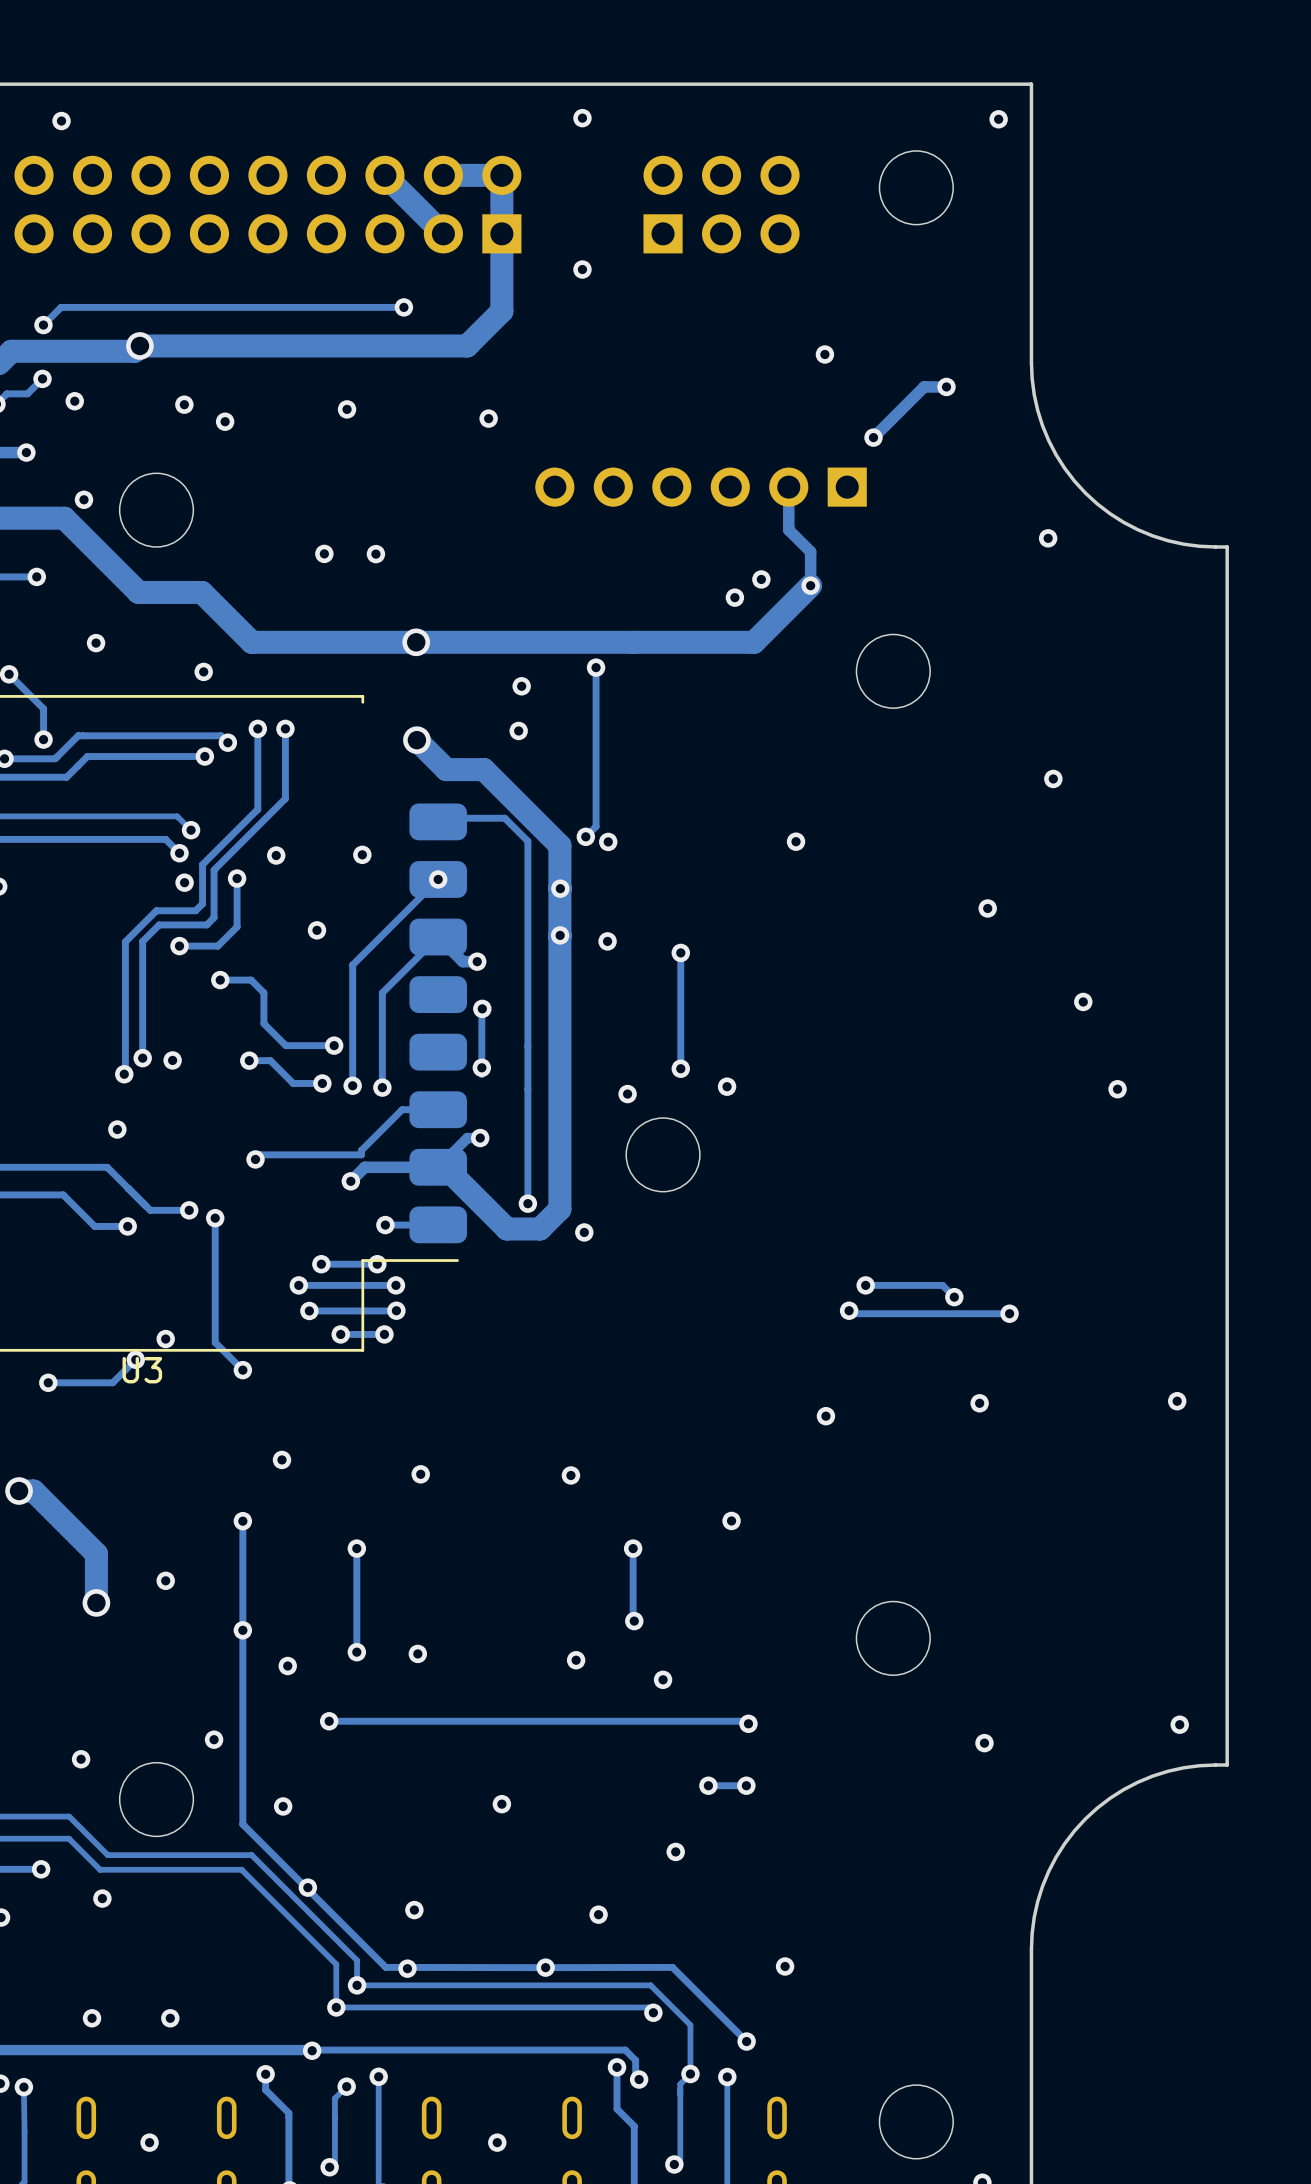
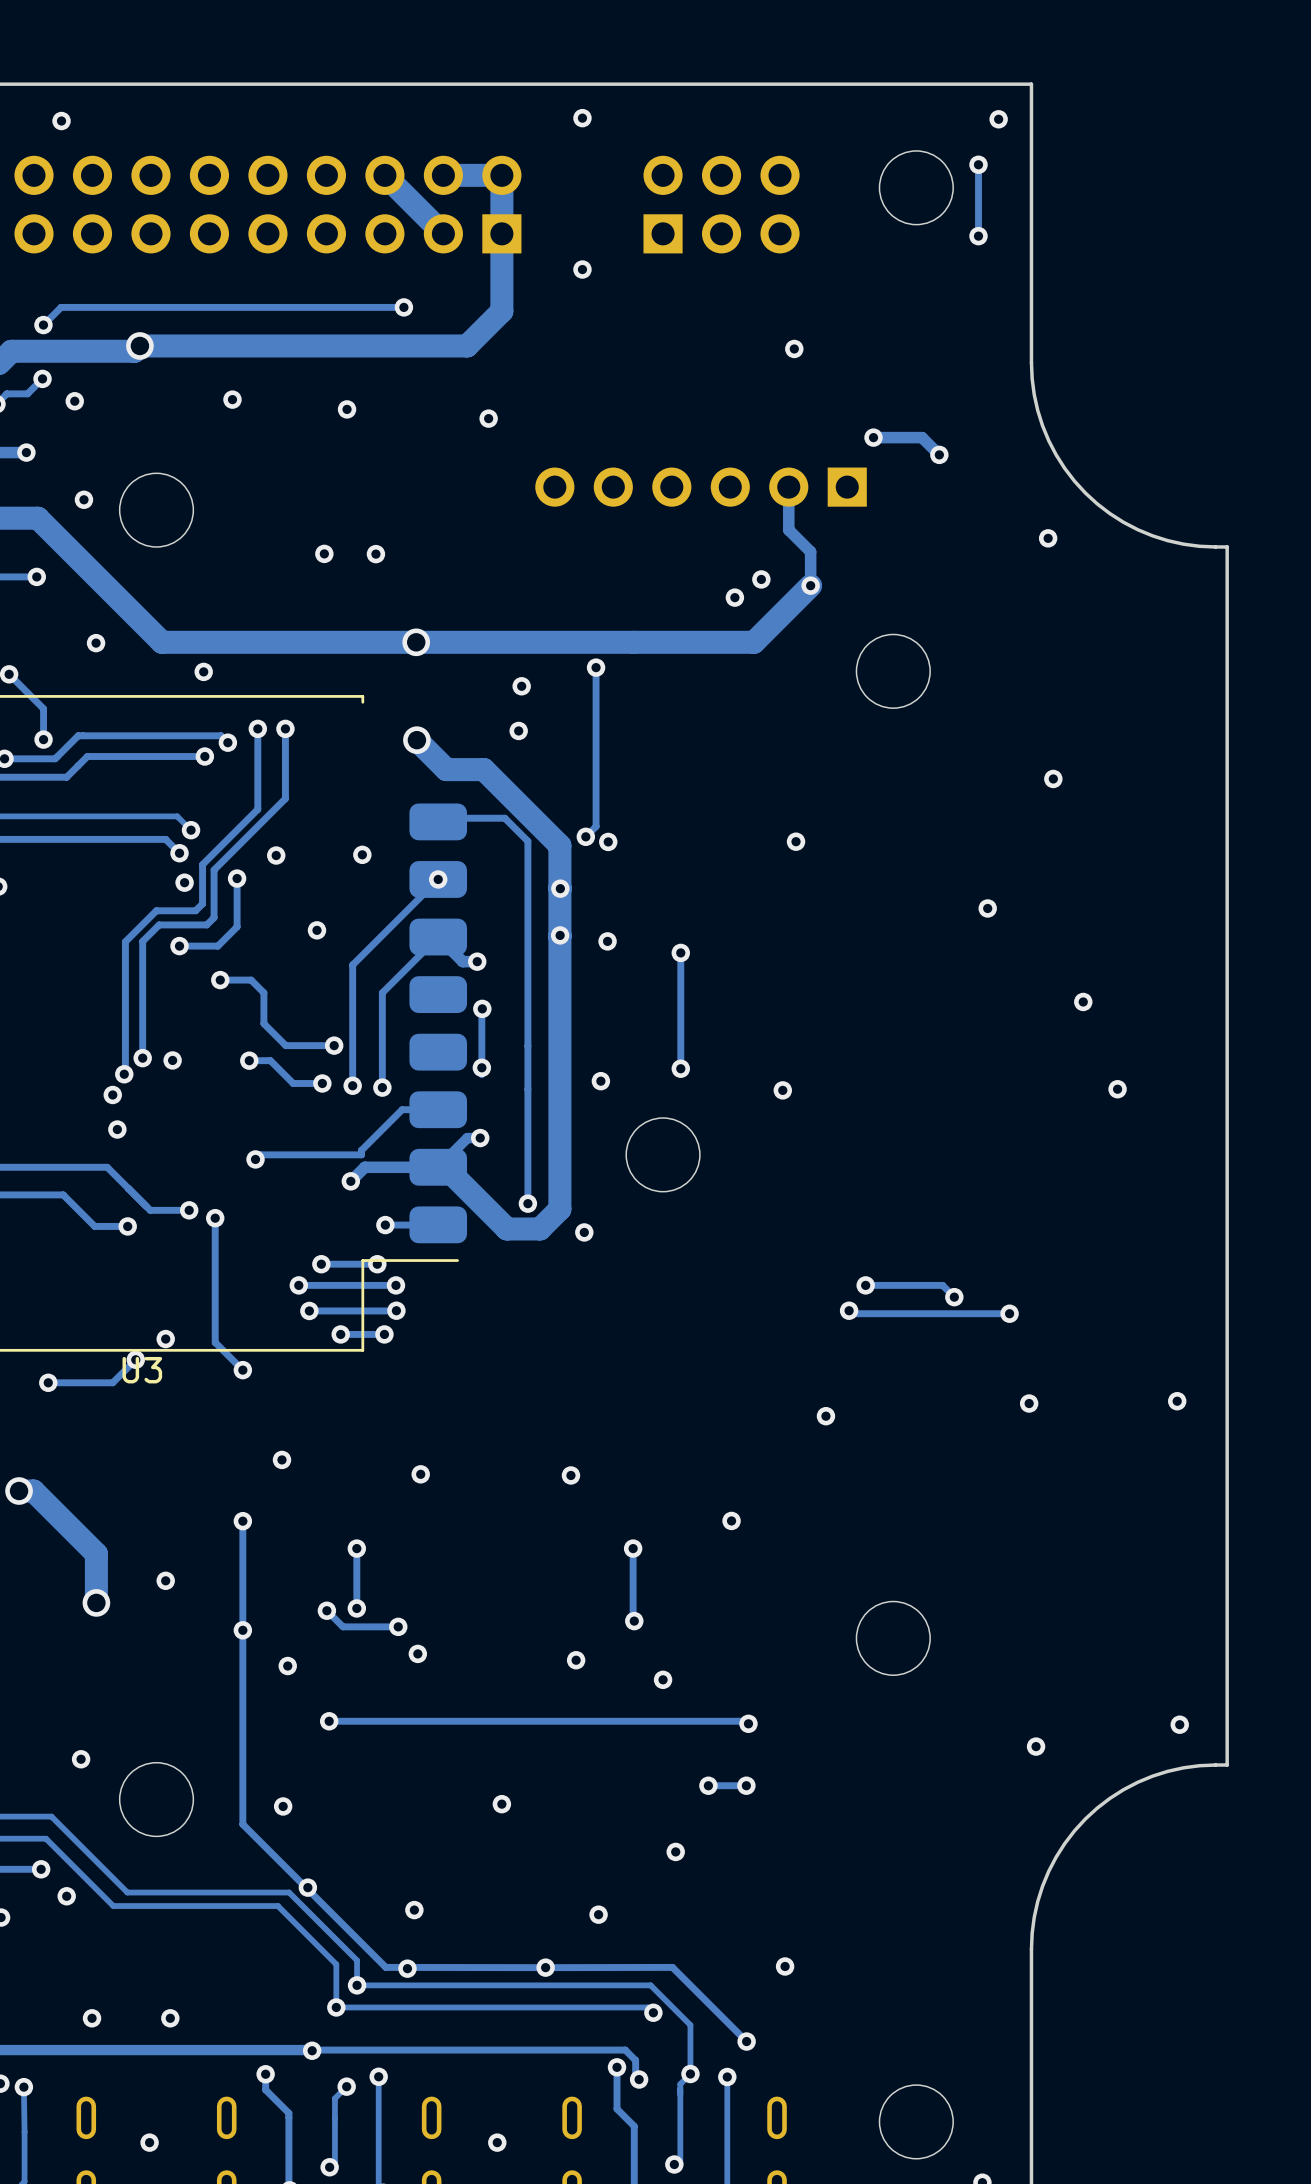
track: none -> (978, 164) (978, 236)
via: none -> (978, 164)
via: none -> (978, 236)
via position: (824, 354) -> (794, 348)
track: (946, 386) (924, 386) (873, 437) -> (939, 454) (922, 437) (873, 437)
via position: (946, 386) -> (939, 454)
via: (184, 404) -> none
via position: (225, 421) -> (232, 399)
track: (37, 518) (64, 518) (138, 592) (201, 592) (251, 642) -> (37, 518) (162, 642) (251, 642)
via position: (727, 1086) -> (782, 1090)
via: none -> (112, 1094)
via position: (627, 1094) -> (600, 1081)
via position: (979, 1403) -> (1029, 1403)
track: (356, 1608) (356, 1652) -> none
via: none -> (356, 1608)
track: none -> (326, 1610) (343, 1626) (398, 1626)
via: none -> (326, 1610)
via: none -> (398, 1626)
via: (356, 1652) -> none
via: (214, 1739) -> none
via position: (984, 1743) -> (1036, 1746)
track: (51, 1816) (69, 1816) (107, 1855) (251, 1855) (289, 1892) -> (51, 1816) (127, 1892) (289, 1892)
track: (45, 1838) (69, 1838) (100, 1869) (241, 1869) (277, 1906) -> (45, 1838) (113, 1906) (277, 1906)
via position: (102, 1898) -> (66, 1896)

